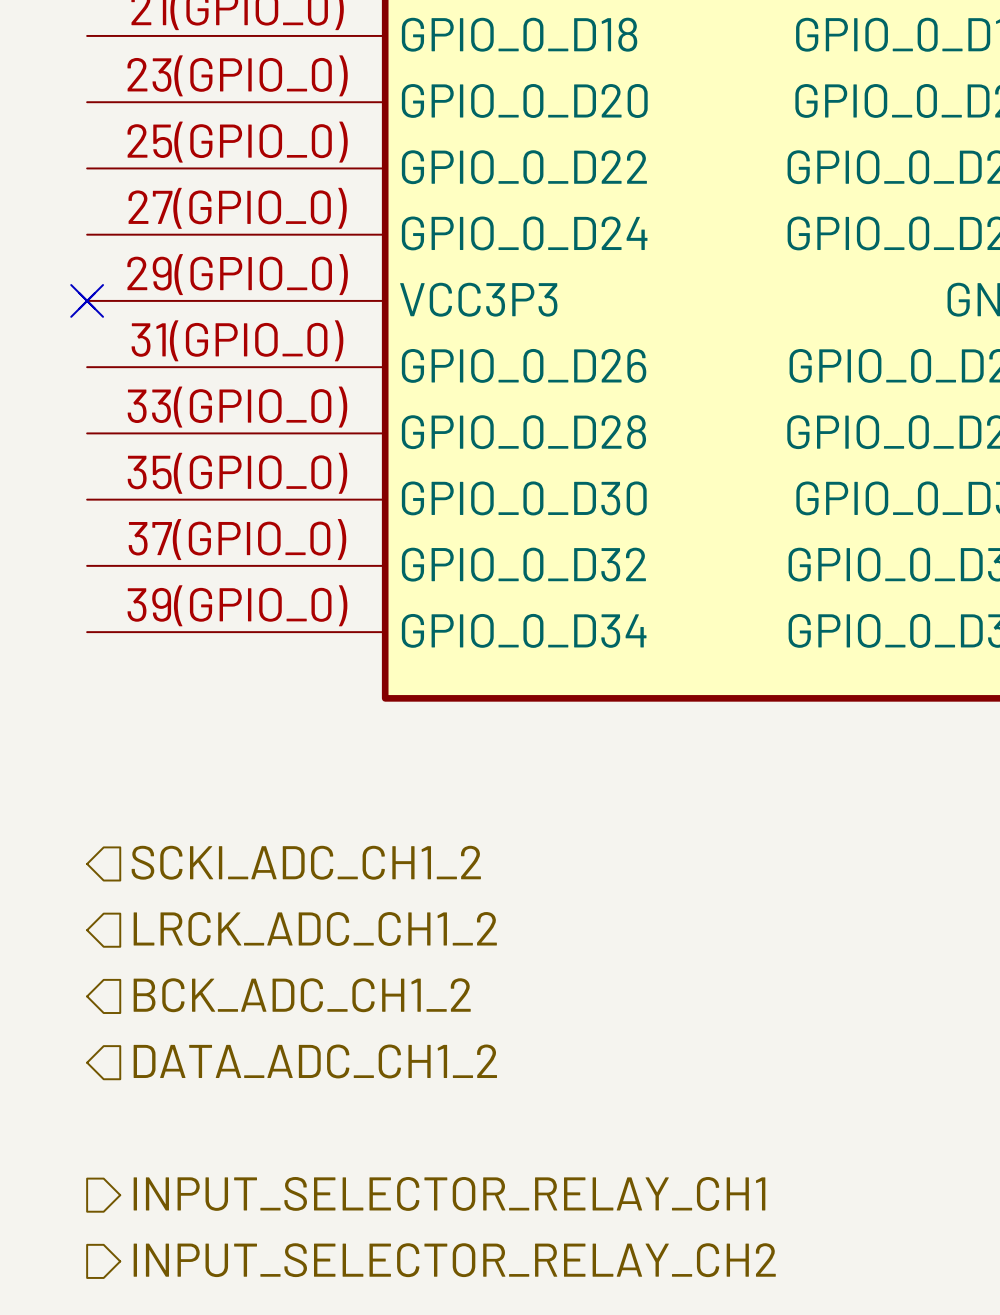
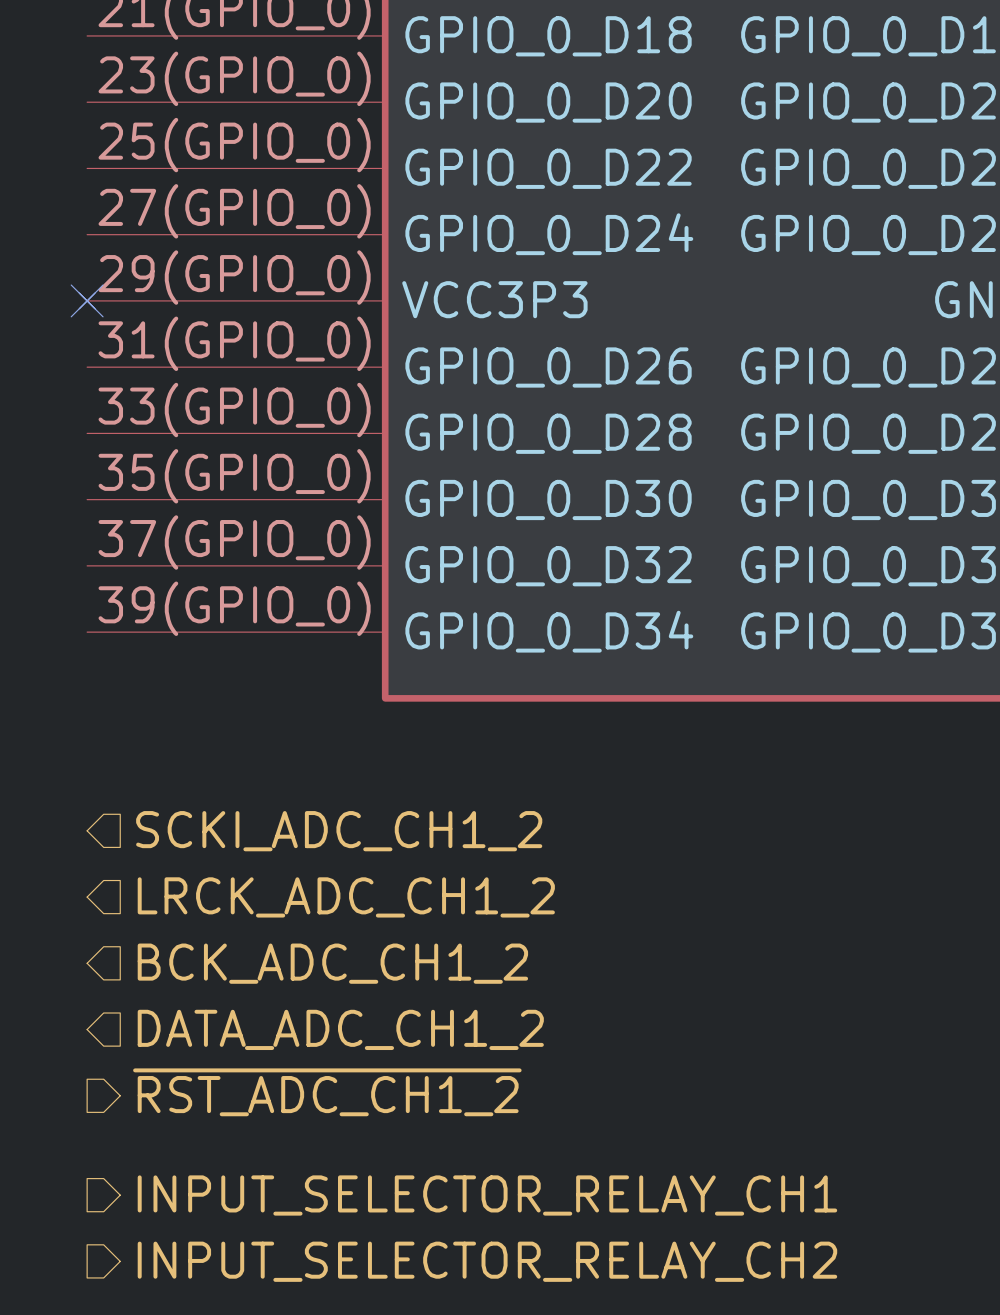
hierarchical label position: SCKI_ADC_CH1_2 (306, 862) -> SCKI_ADC_CH1_2 (339, 831)
hierarchical label position: LRCK_ADC_CH1_2 (315, 928) -> LRCK_ADC_CH1_2 (346, 897)
hierarchical label position: BCK_ADC_CH1_2 (302, 995) -> BCK_ADC_CH1_2 (332, 963)
hierarchical label position: DATA_ADC_CH1_2 (315, 1061) -> DATA_ADC_CH1_2 (340, 1029)
hierarchical label: none -> ~{RST_ADC_CH1_2} (327, 1092)

